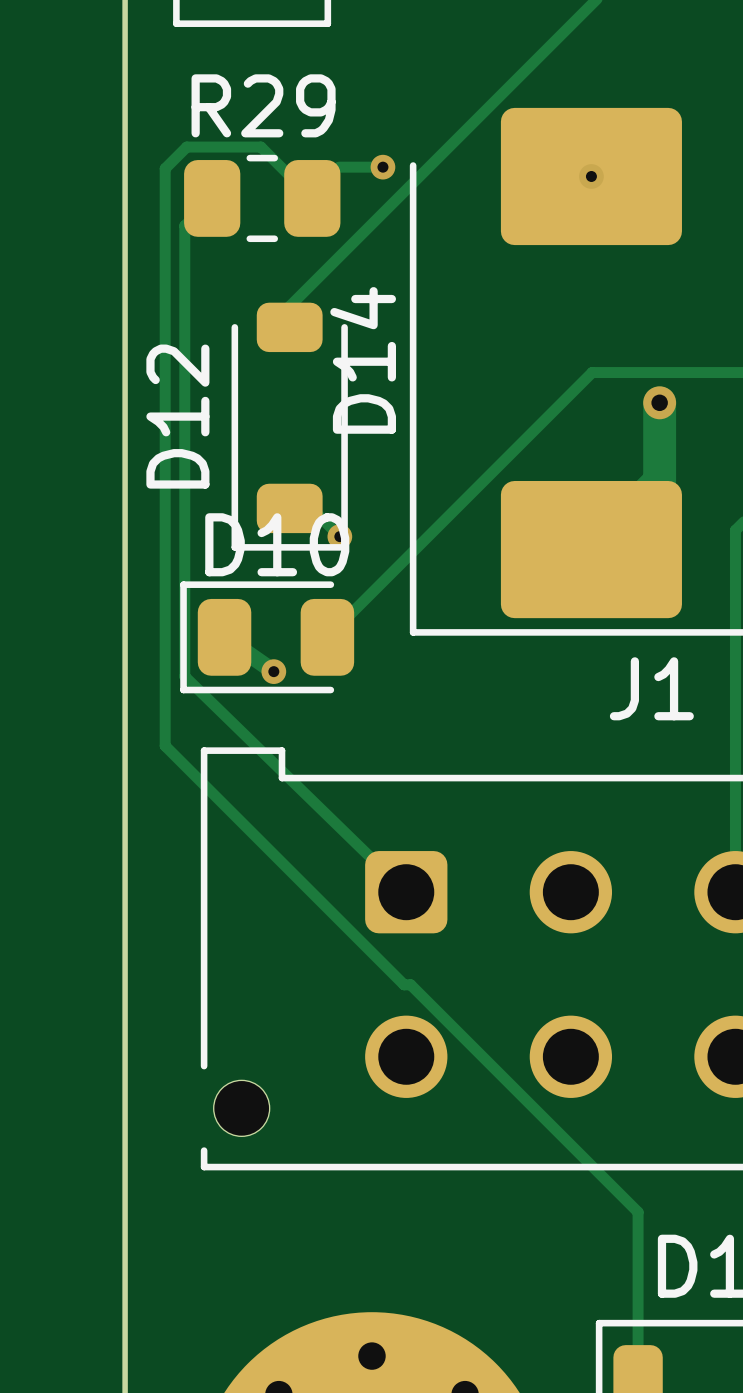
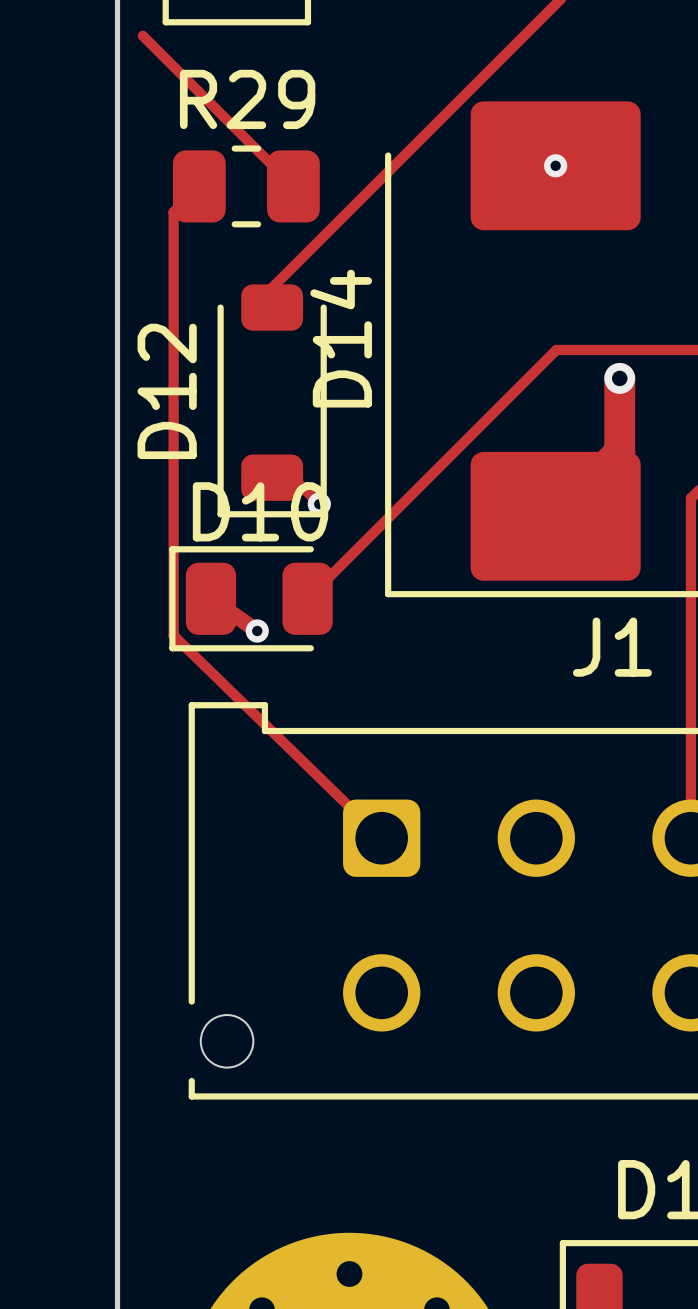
track: (260, 147) (186, 147) (165, 168) (165, 745) (404, 984) (410, 984) (638, 1212) (638, 1378) -> (245, 138) (142, 35)
track: (339, 167) (382, 167) -> none
via: (382, 167) -> none

